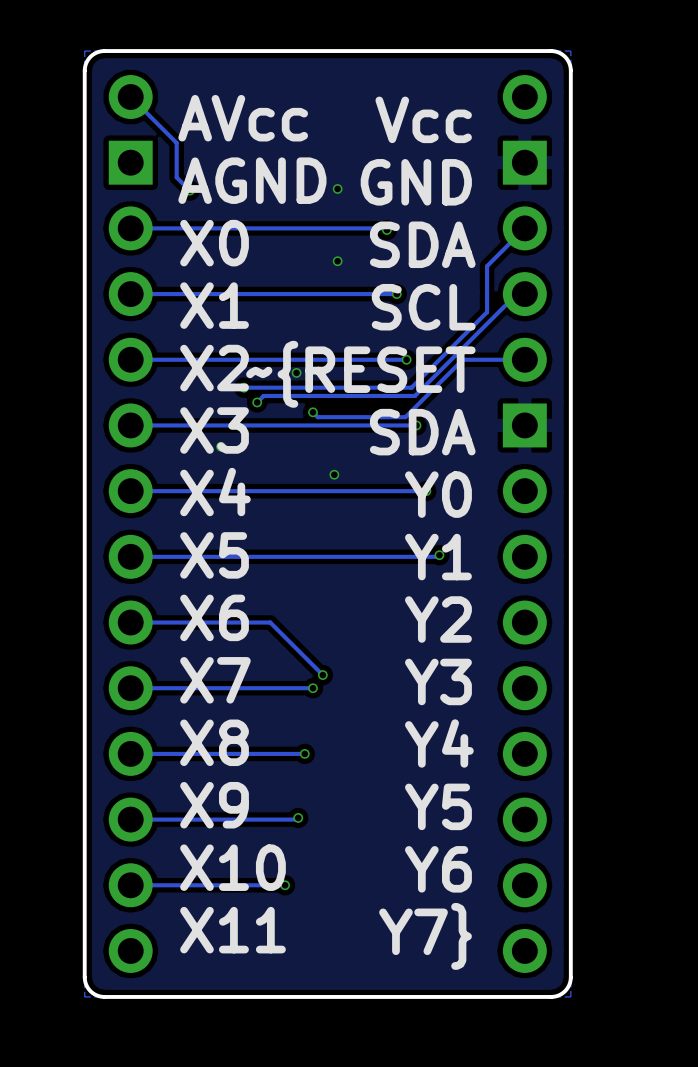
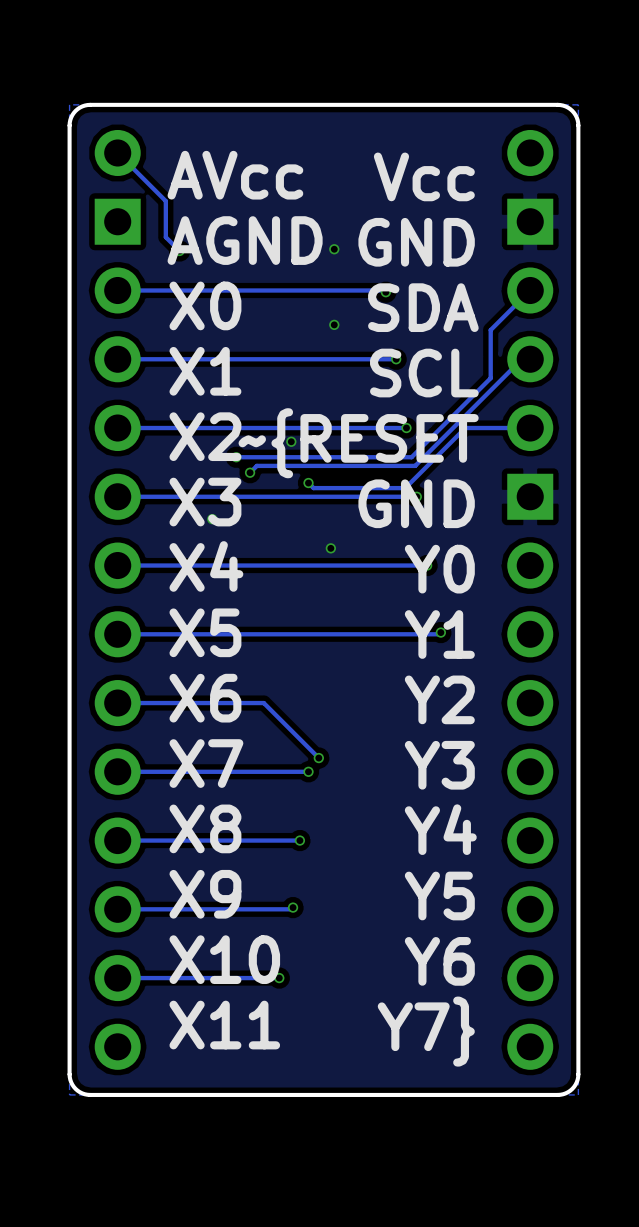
text: SDA (422, 432) -> GND (416, 503)

